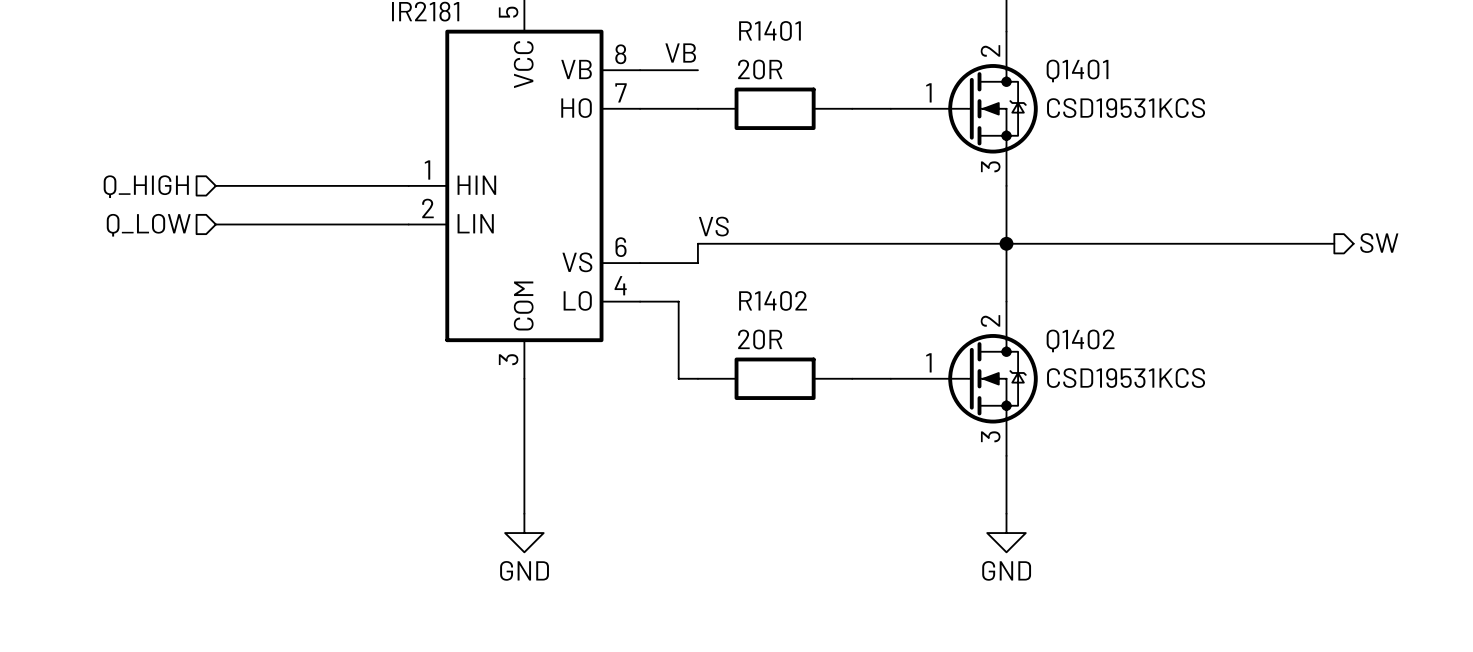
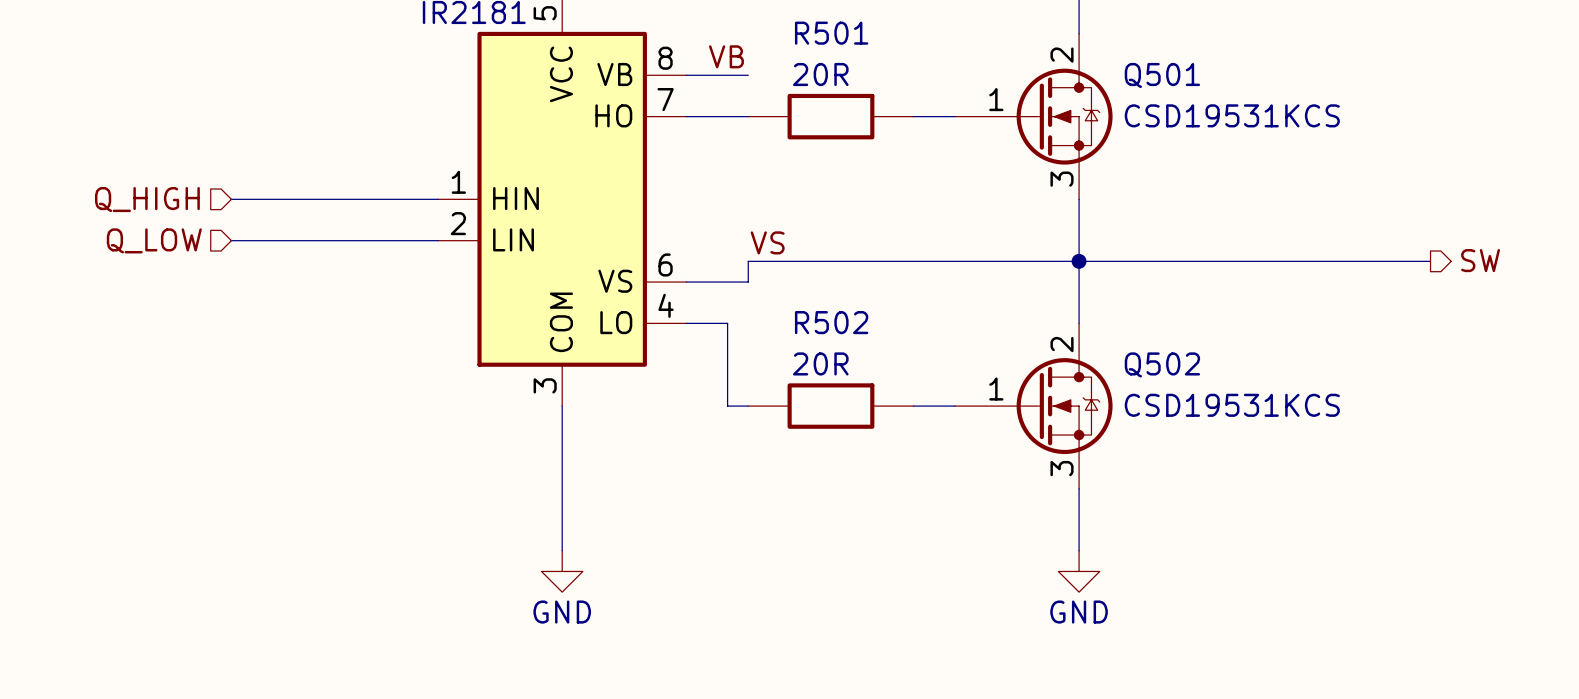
R1401 name: R1401 (769, 30) -> R501 (831, 33)
Q1401 name: Q1401 (1077, 70) -> Q501 (1162, 75)
R1402 name: R1402 (773, 300) -> R502 (831, 322)
Q1402 name: Q1402 (1080, 340) -> Q502 (1162, 364)

